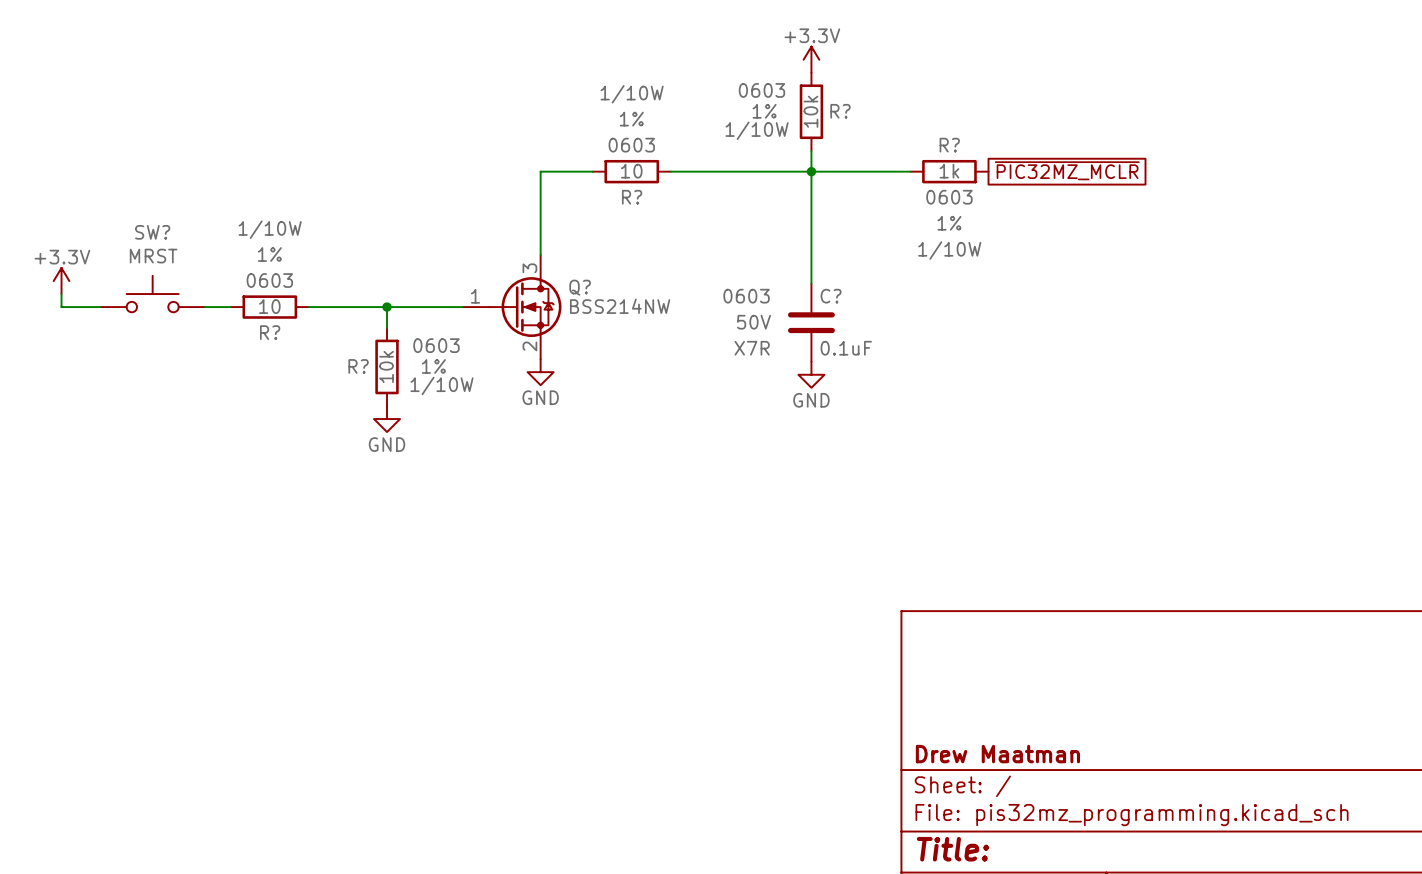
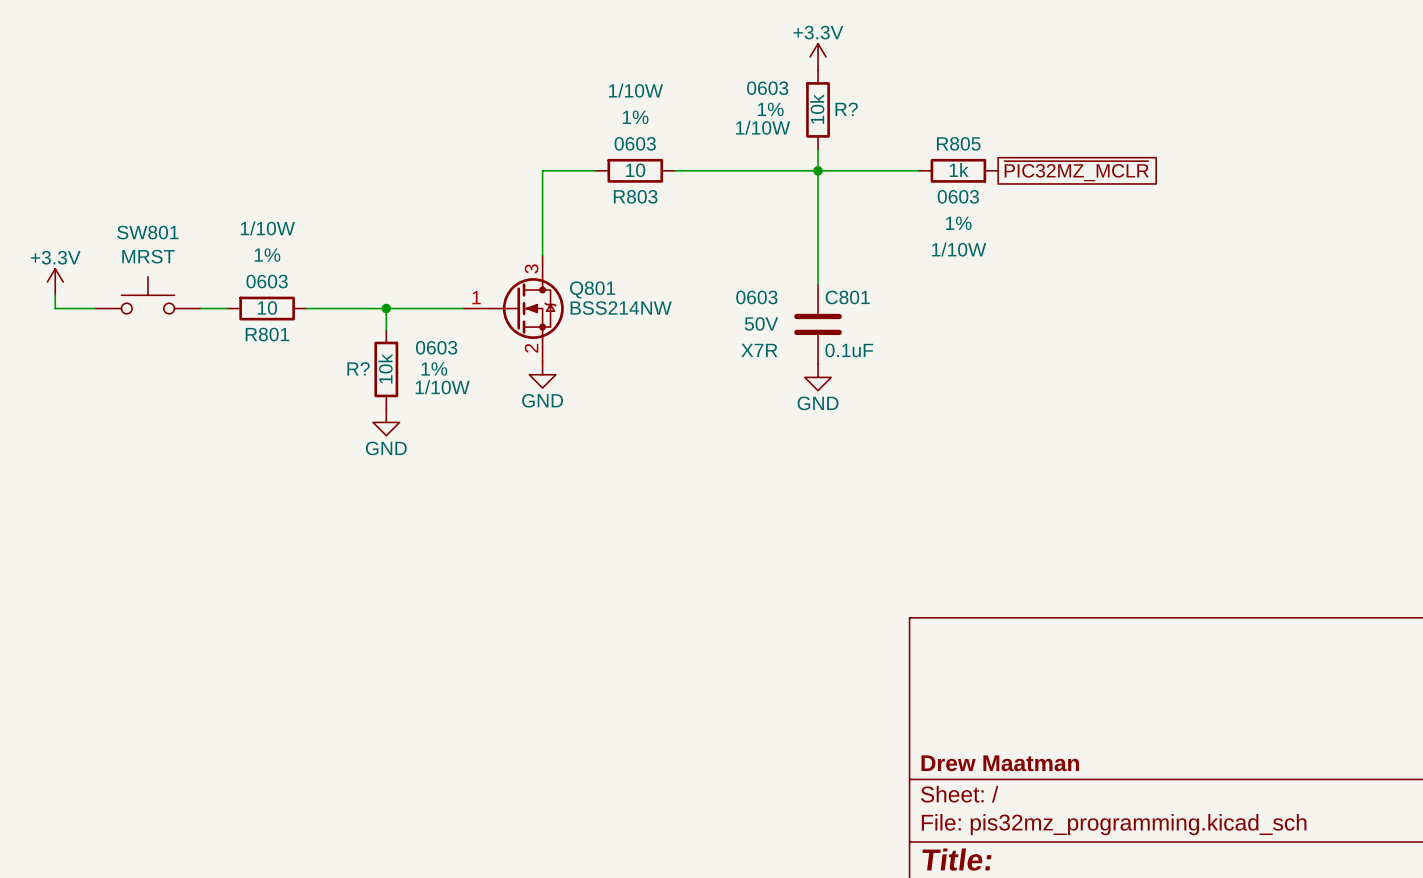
R? name: R? (949, 145) -> R805 (958, 143)
R? name: R? (632, 197) -> R803 (635, 196)
SW? name: SW? (152, 232) -> SW801 (147, 232)
Q? name: Q? (580, 287) -> Q801 (592, 289)
C? name: C? (831, 296) -> C801 (847, 297)
R? name: R? (270, 332) -> R801 (267, 334)

